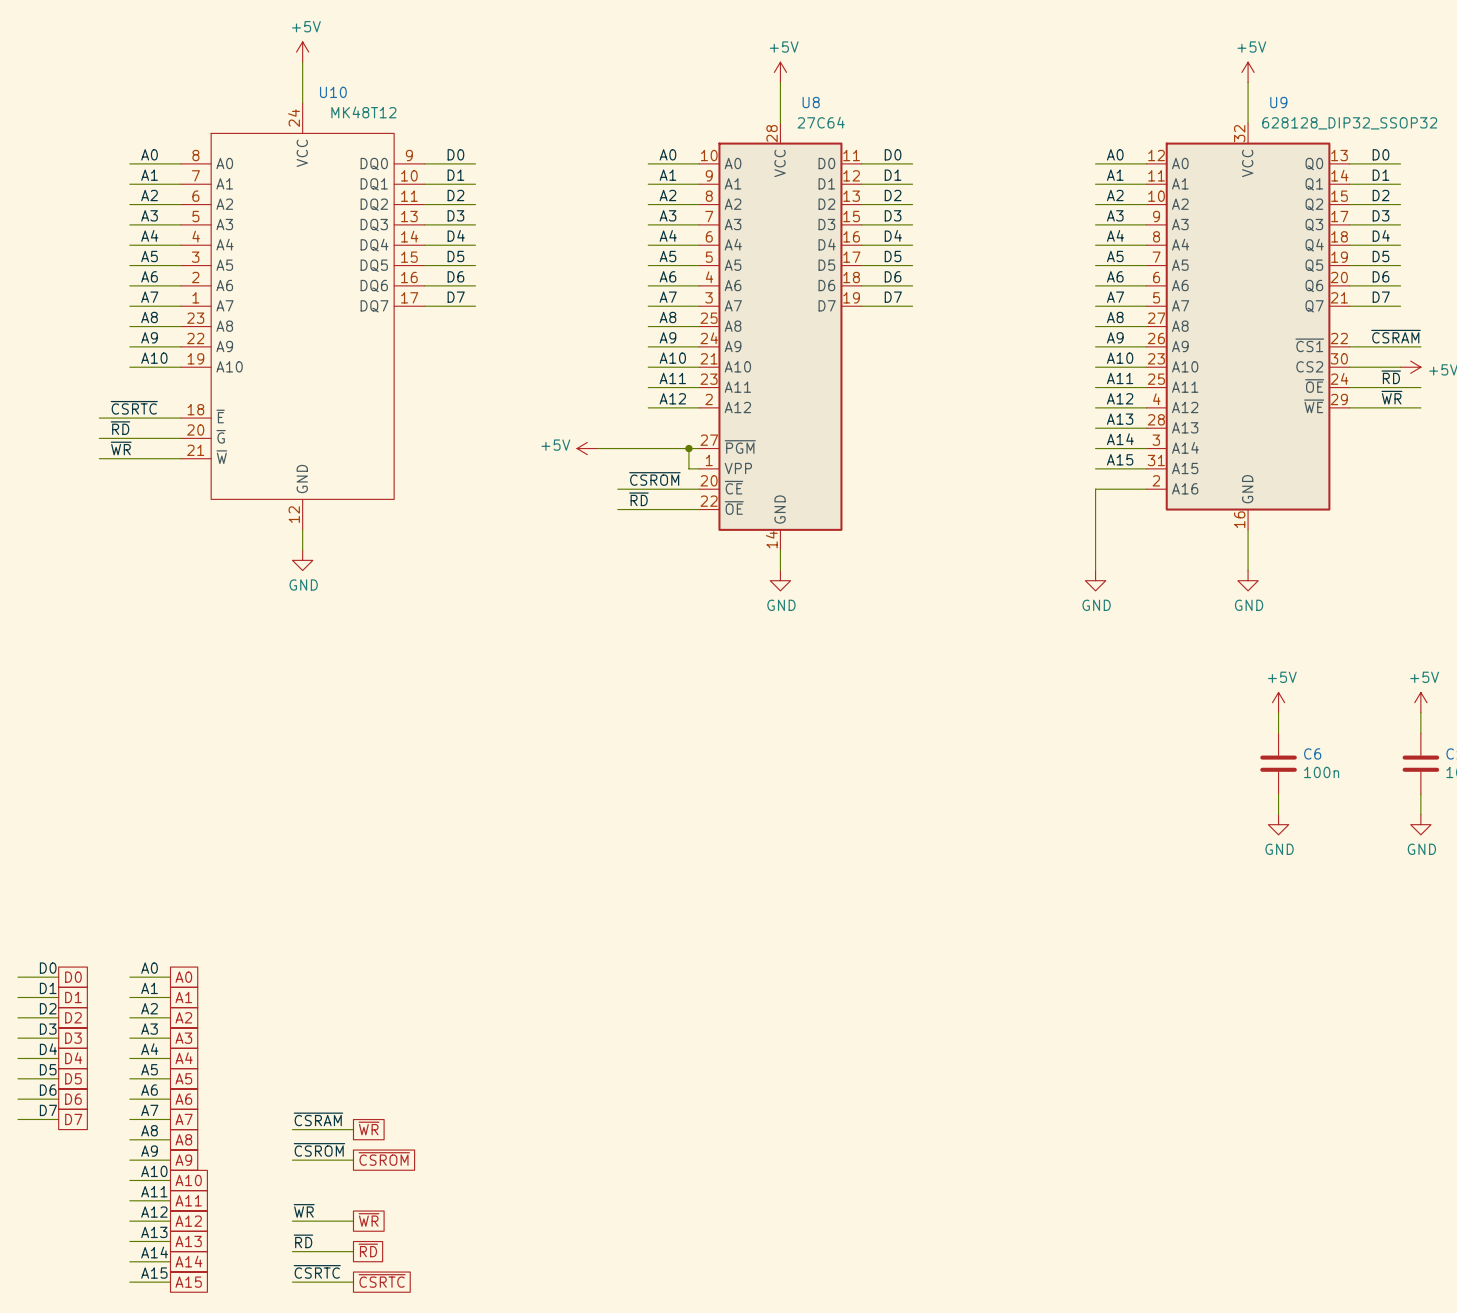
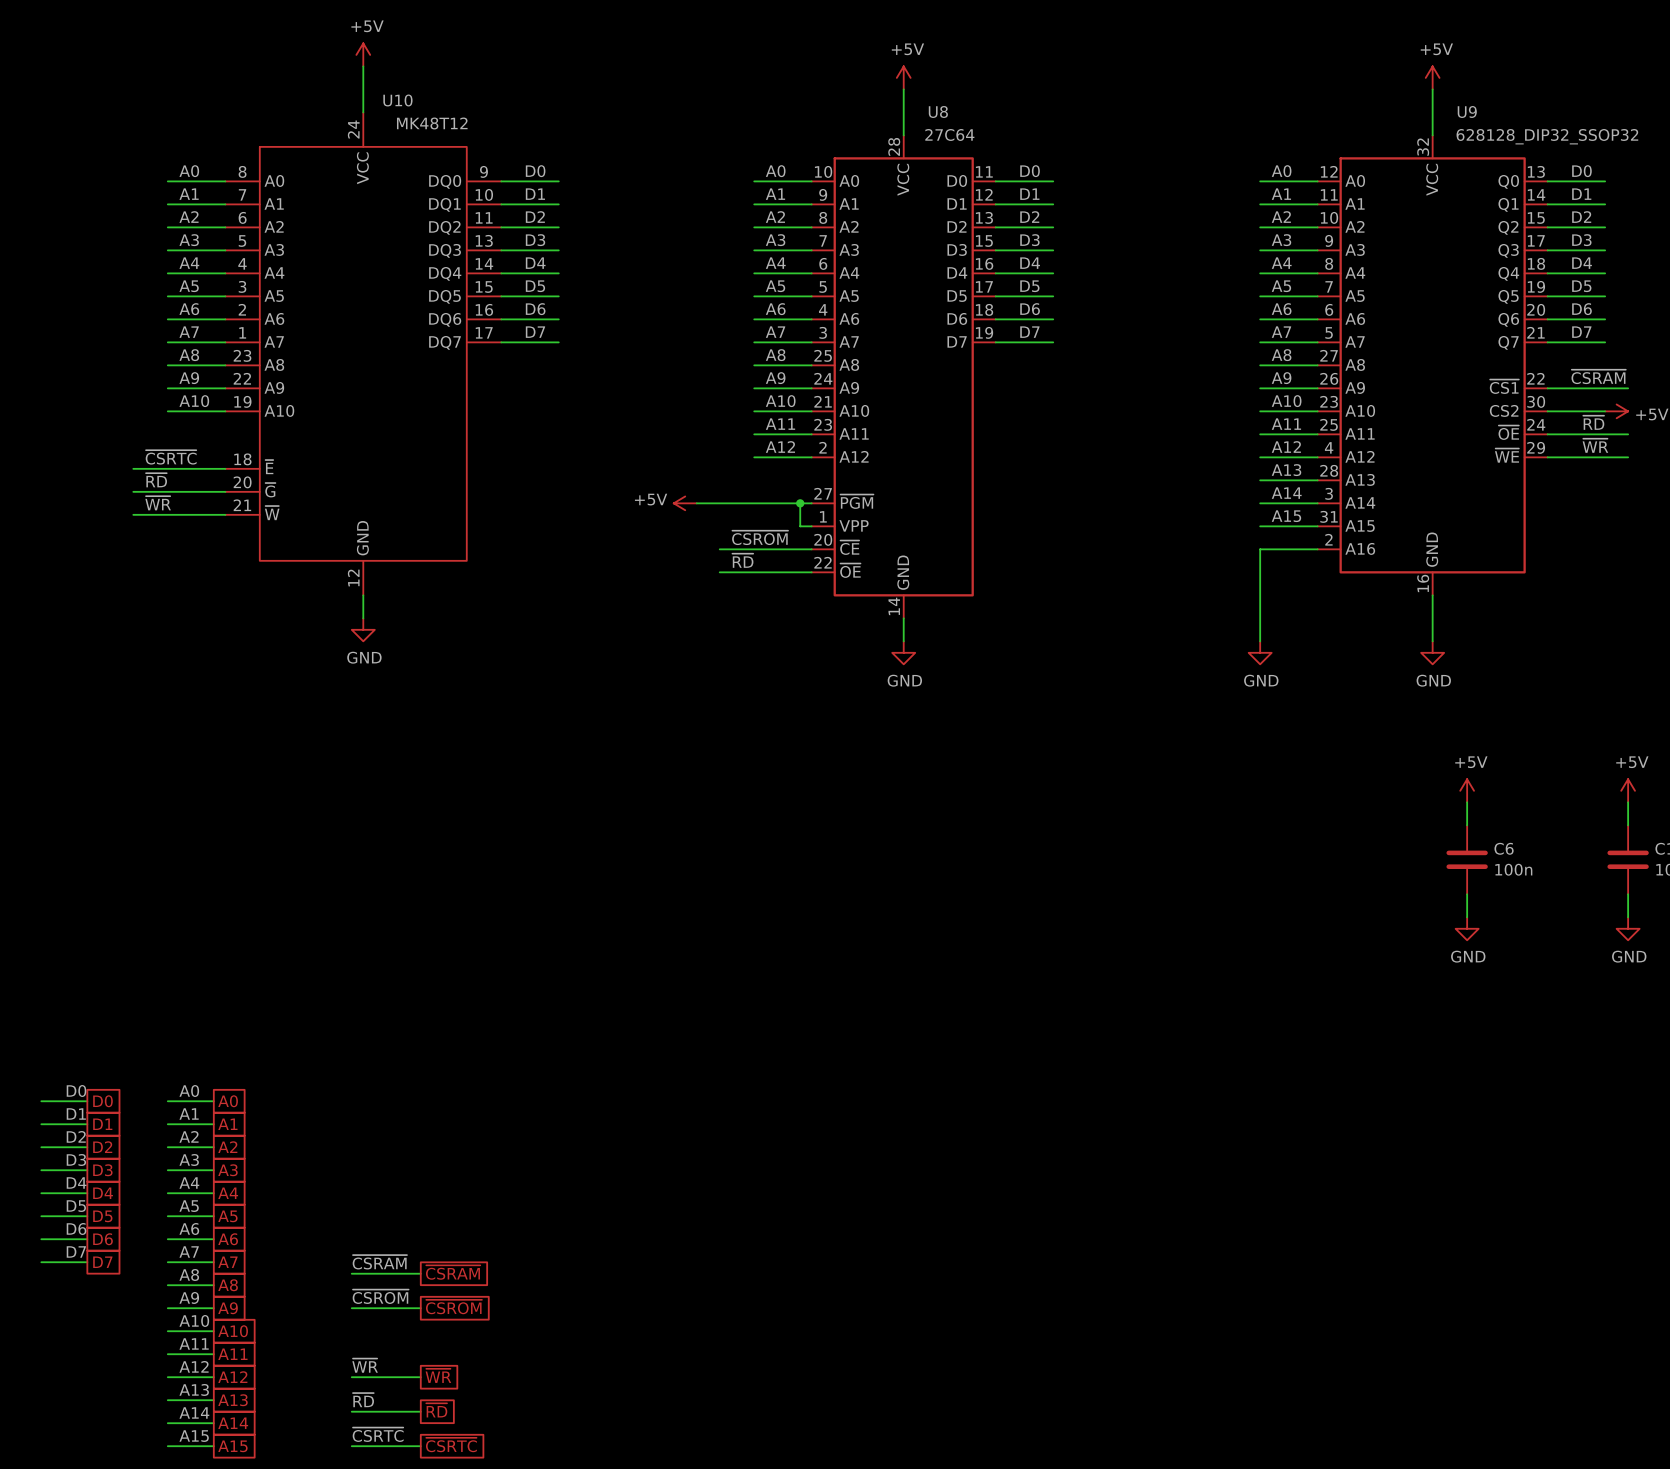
global label: ~{WR} (368, 1128) -> ~{CSRAM} (453, 1272)

